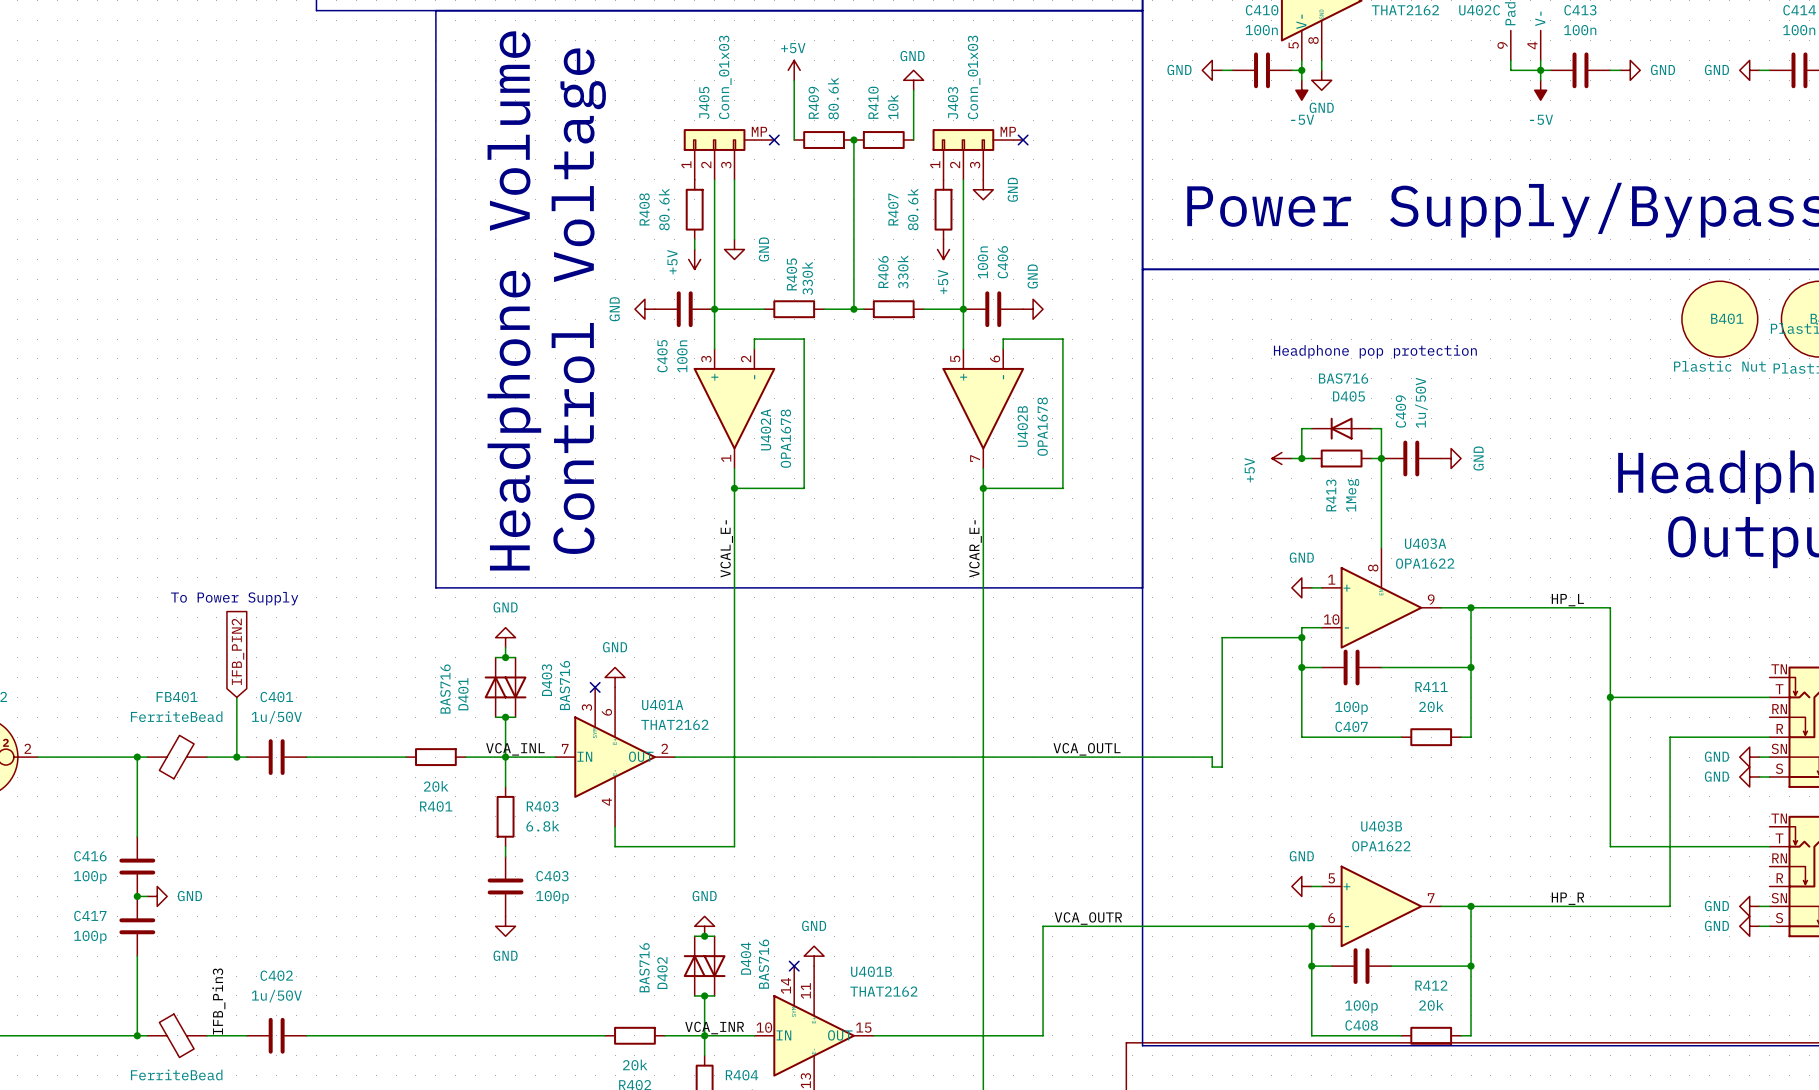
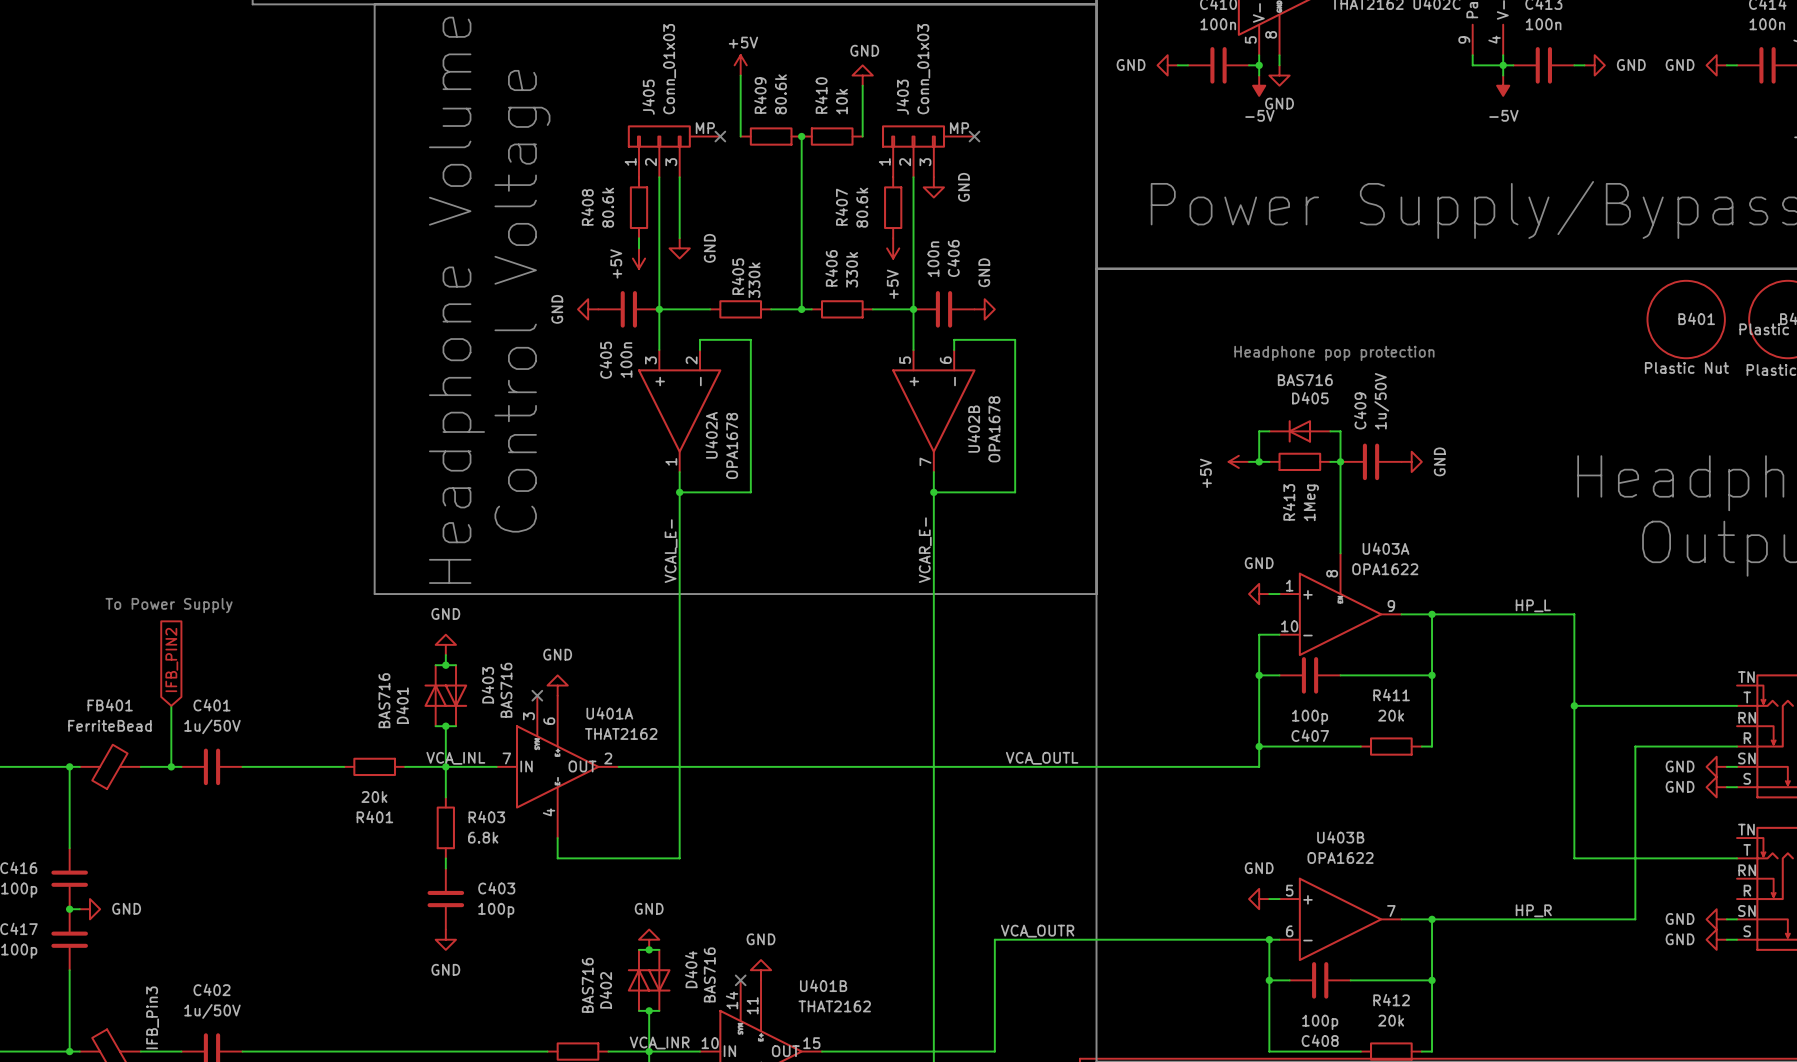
wire: (1301, 637) (1222, 637) (1222, 767) (1212, 767) (1212, 757) -> (1259, 746) (1259, 766) (1167, 766)
junction: (1301, 637) -> none
junction: none -> (1259, 746)

